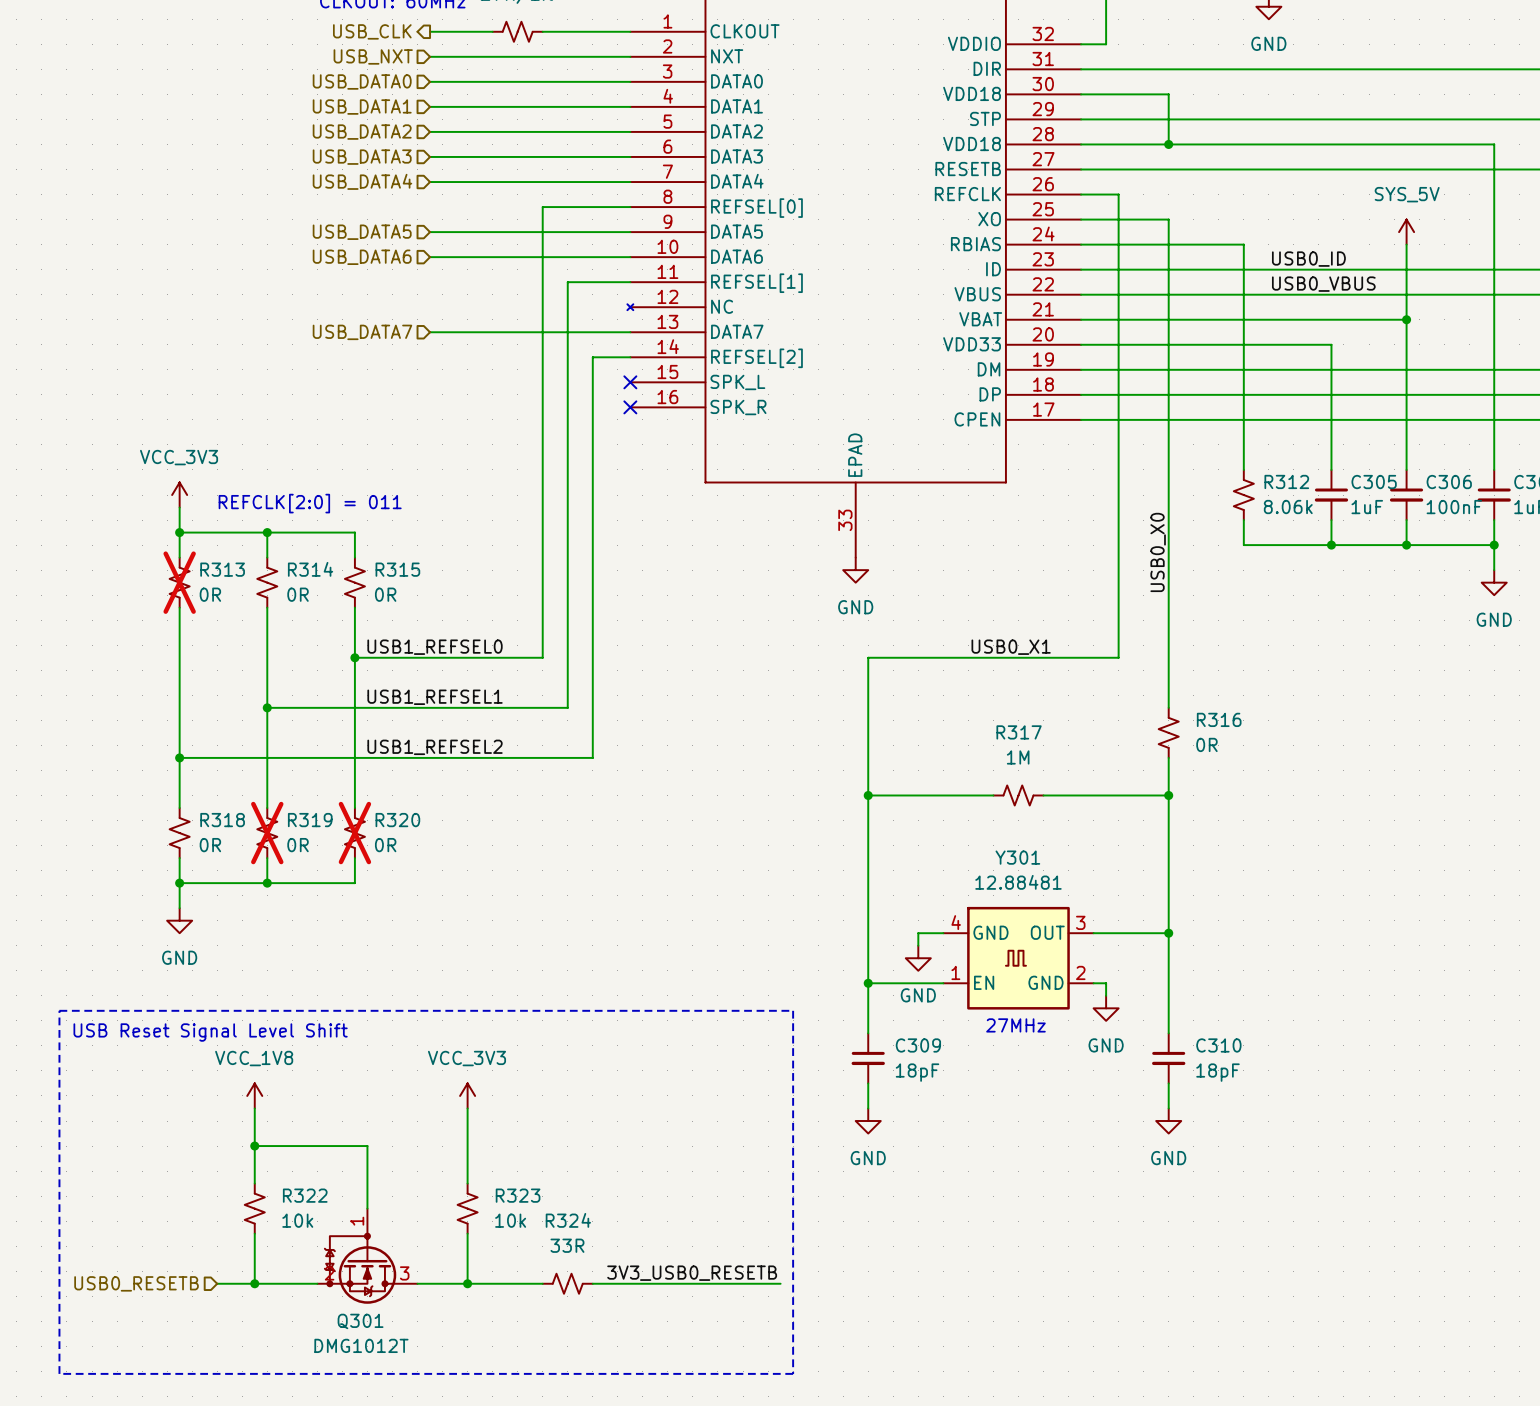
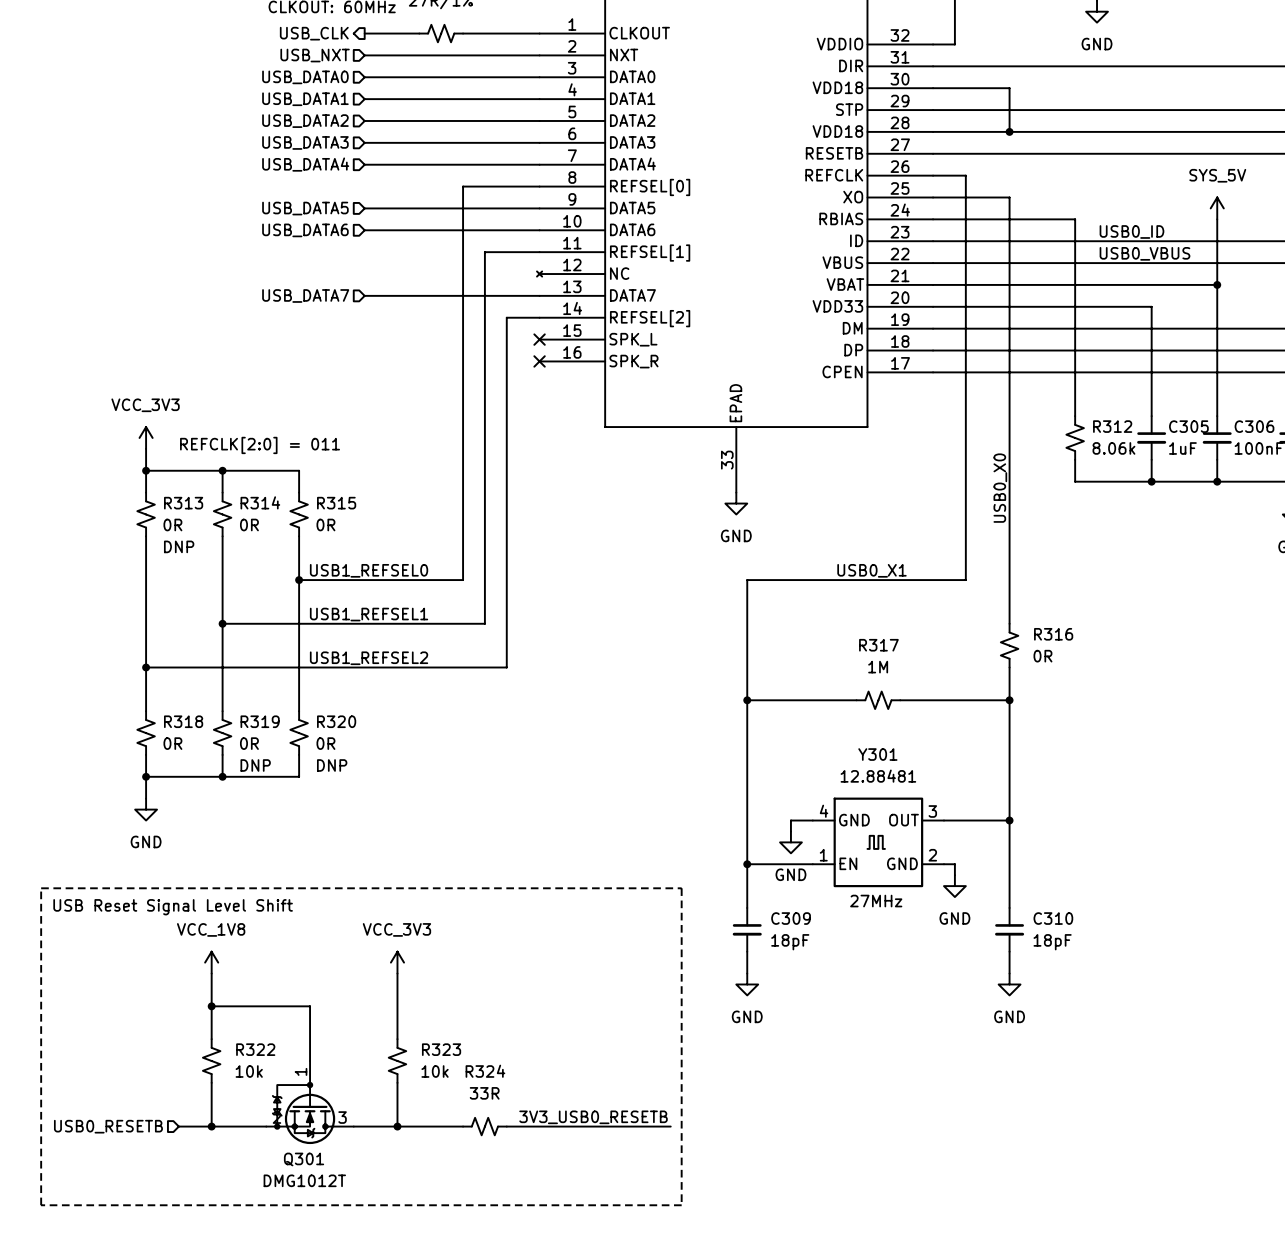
R313 do-not-place cross: (179, 582) -> none
text: none -> DNP (179, 546)
R319 do-not-place cross: (267, 833) -> none
R320 do-not-place cross: (354, 833) -> none
text: none -> DNP (255, 765)
text: none -> DNP (332, 765)

